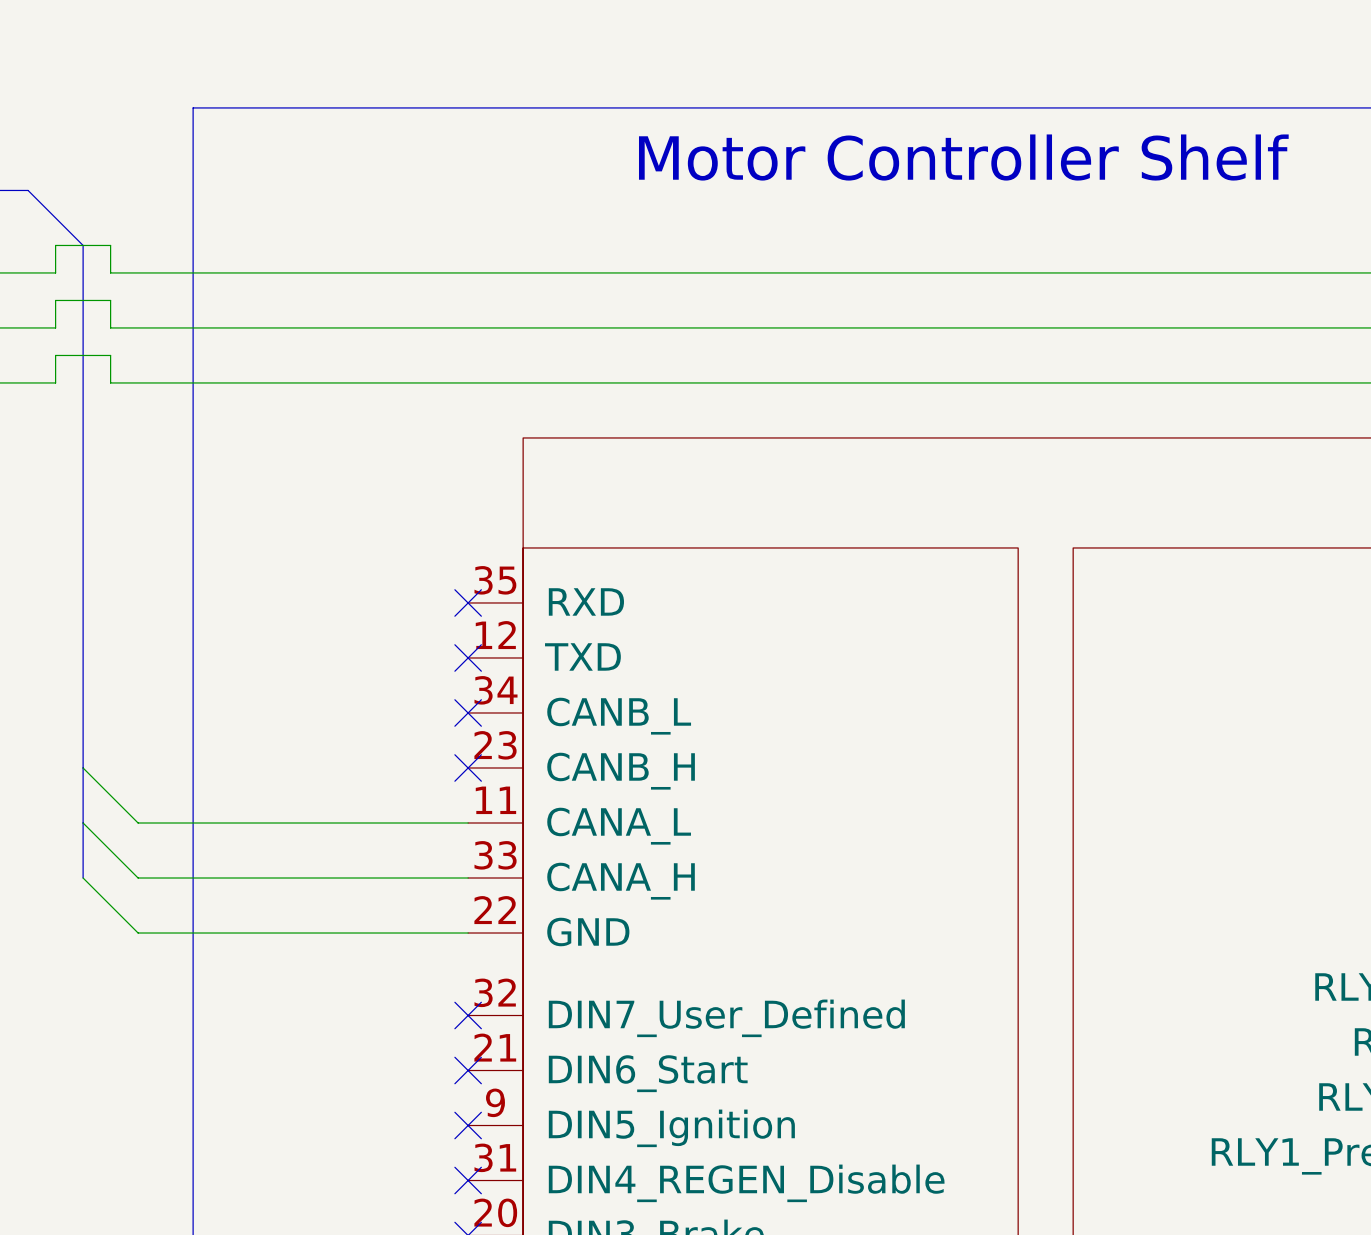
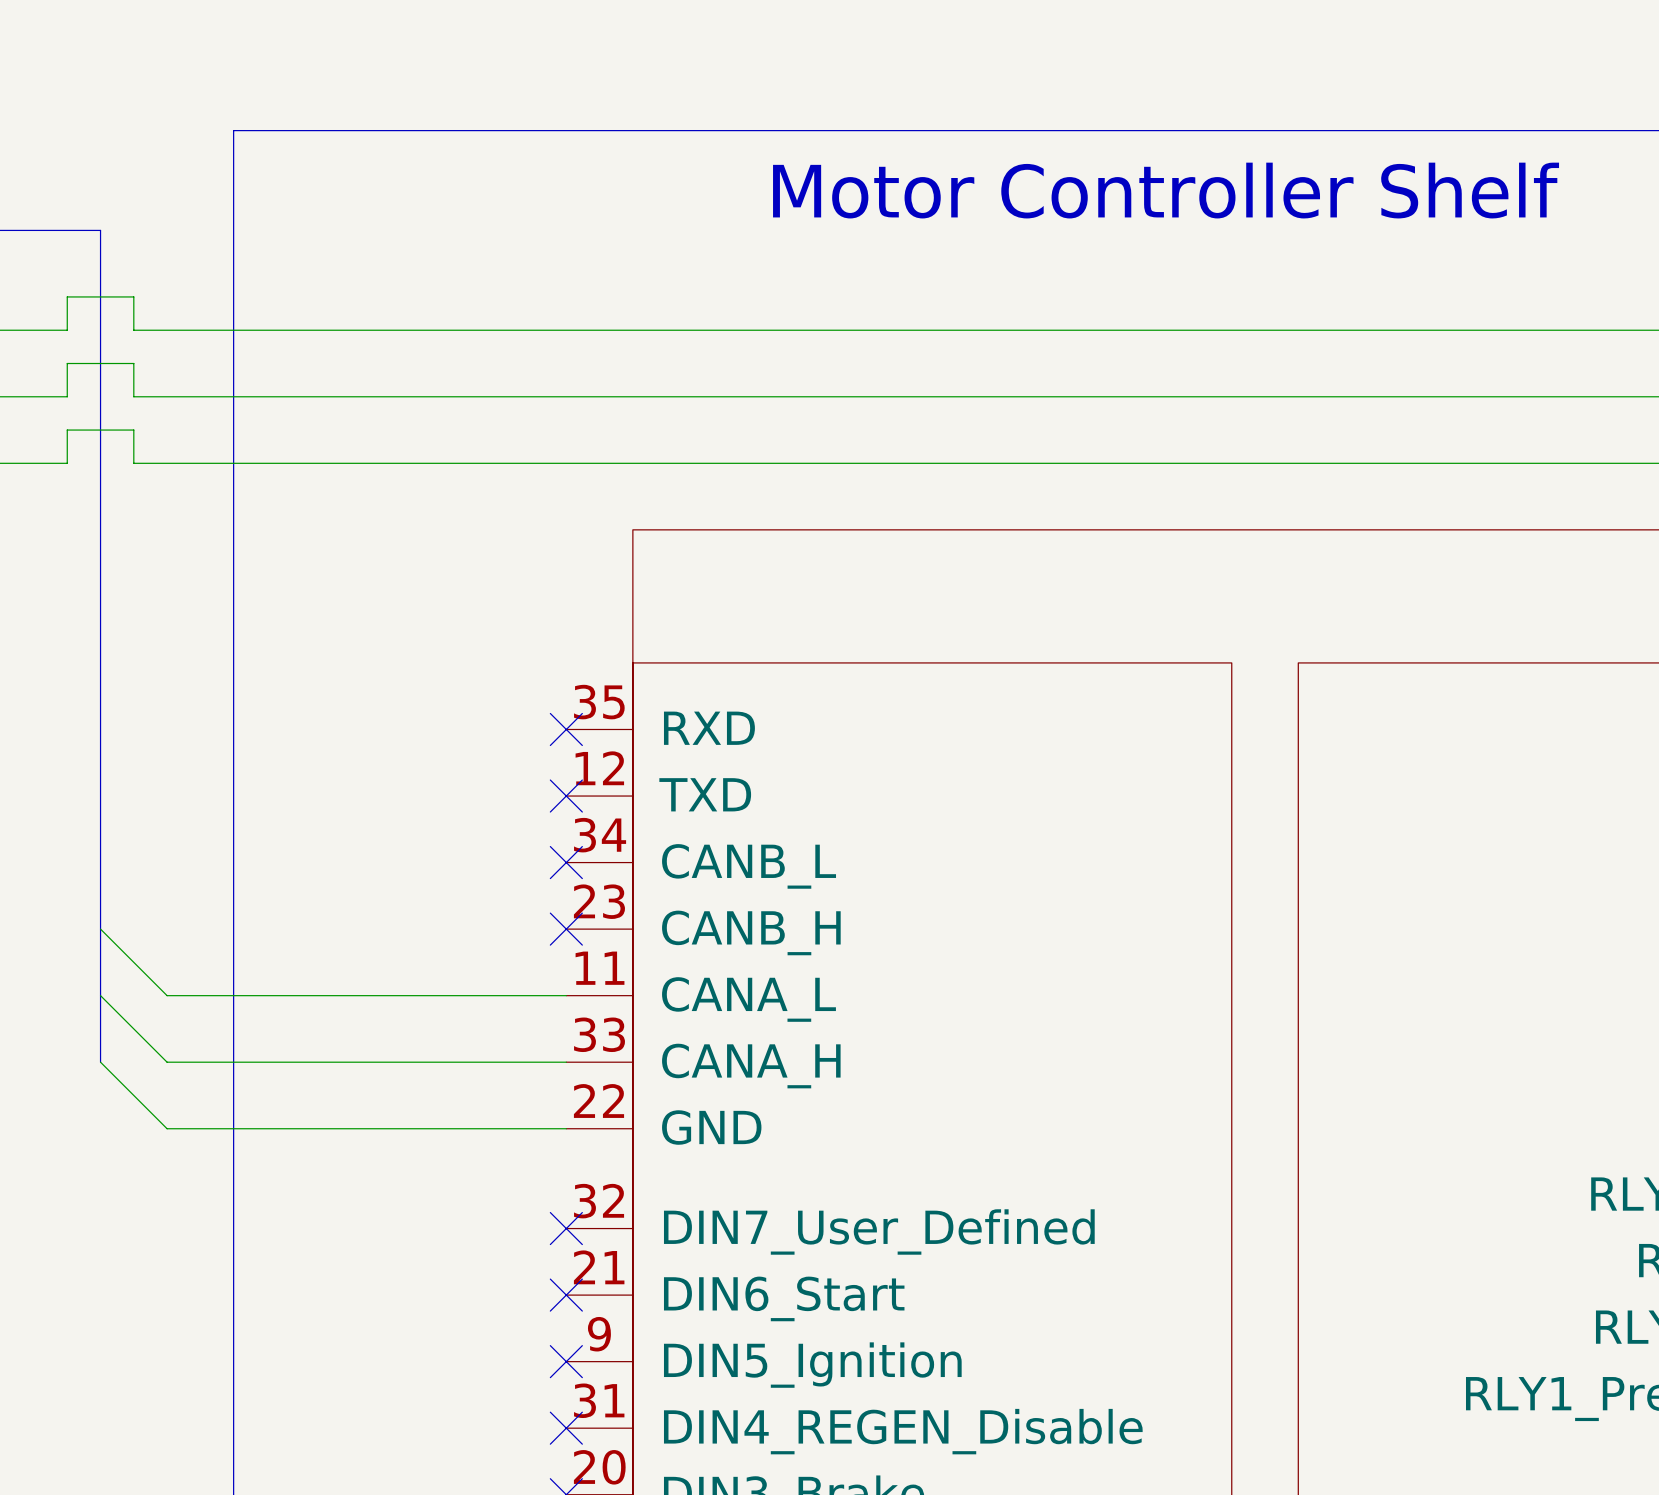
bus: (28, 190) (83, 245) -> (34, 230) (100, 230) (100, 296)

